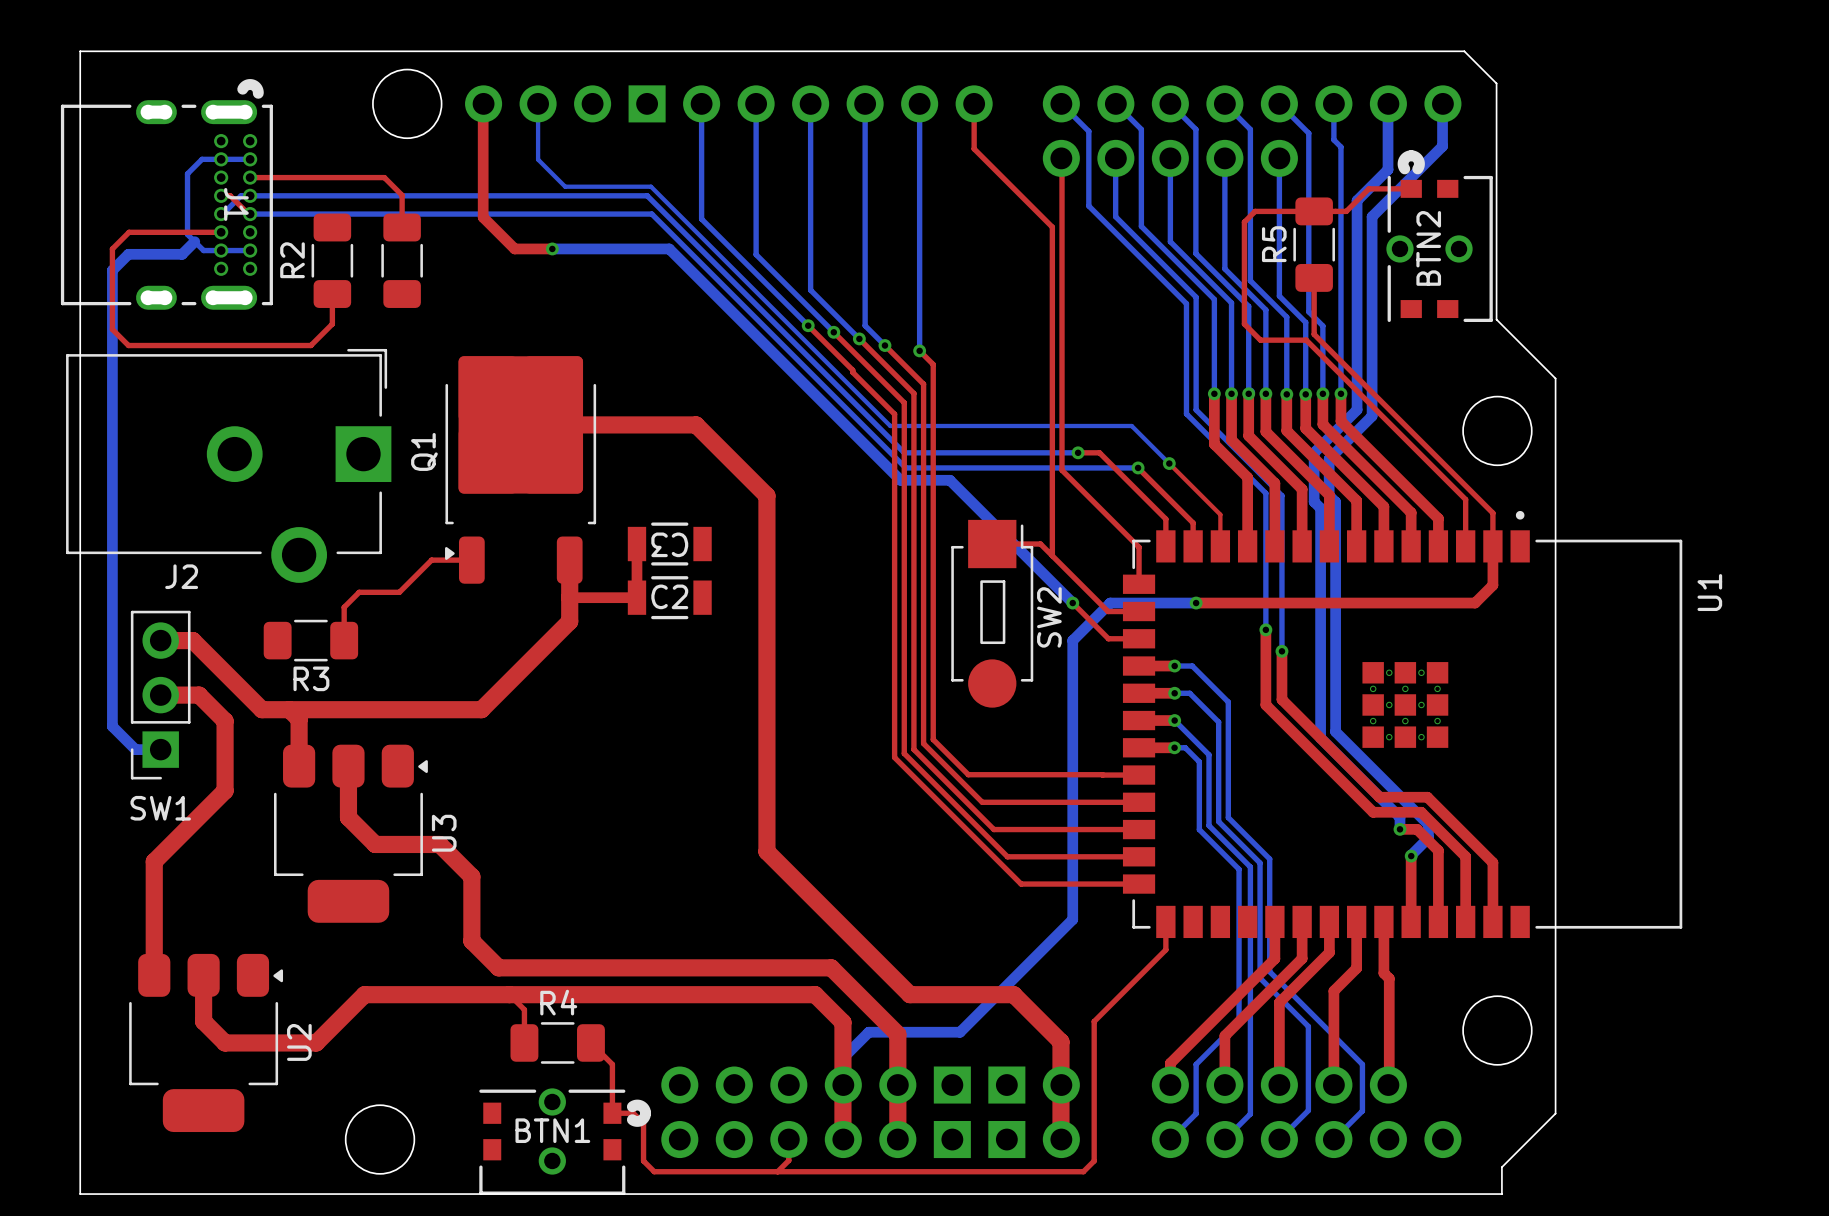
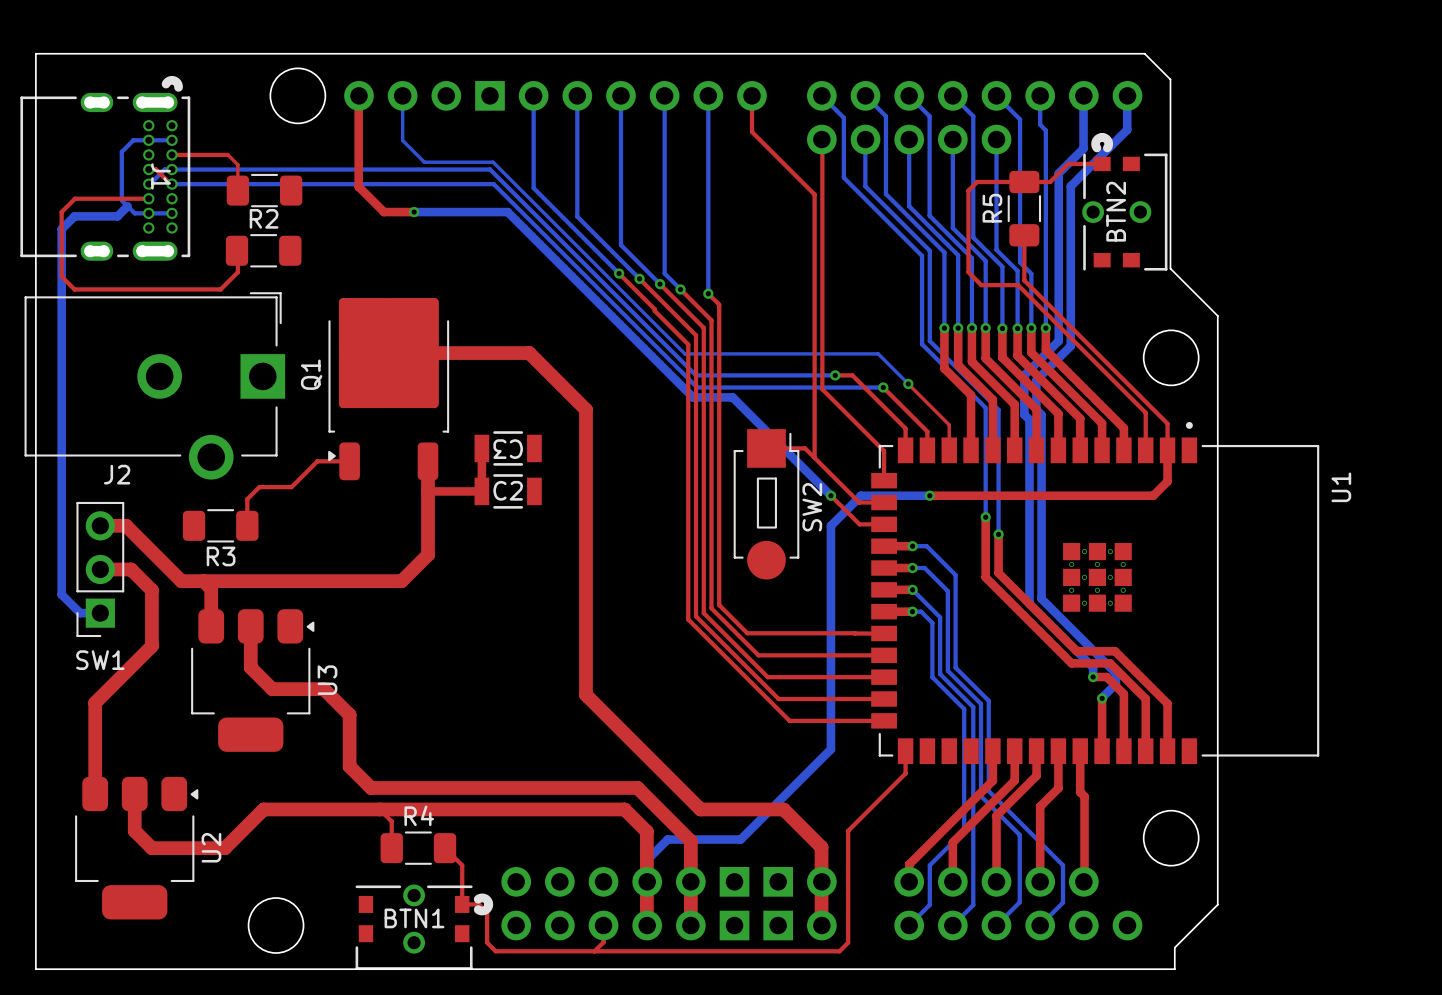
top track: (320, 177) (384, 177) (402, 195) (402, 227) -> (227, 154) (237, 164) (237, 190)
R2 rotation: 0° (332, 260) -> 90° clockwise (263, 250)
part rotation: 0° (402, 260) -> 90° clockwise (264, 190)
top track: (569, 621) (481, 709) -> (428, 510) (428, 554) (401, 581) (357, 581)

